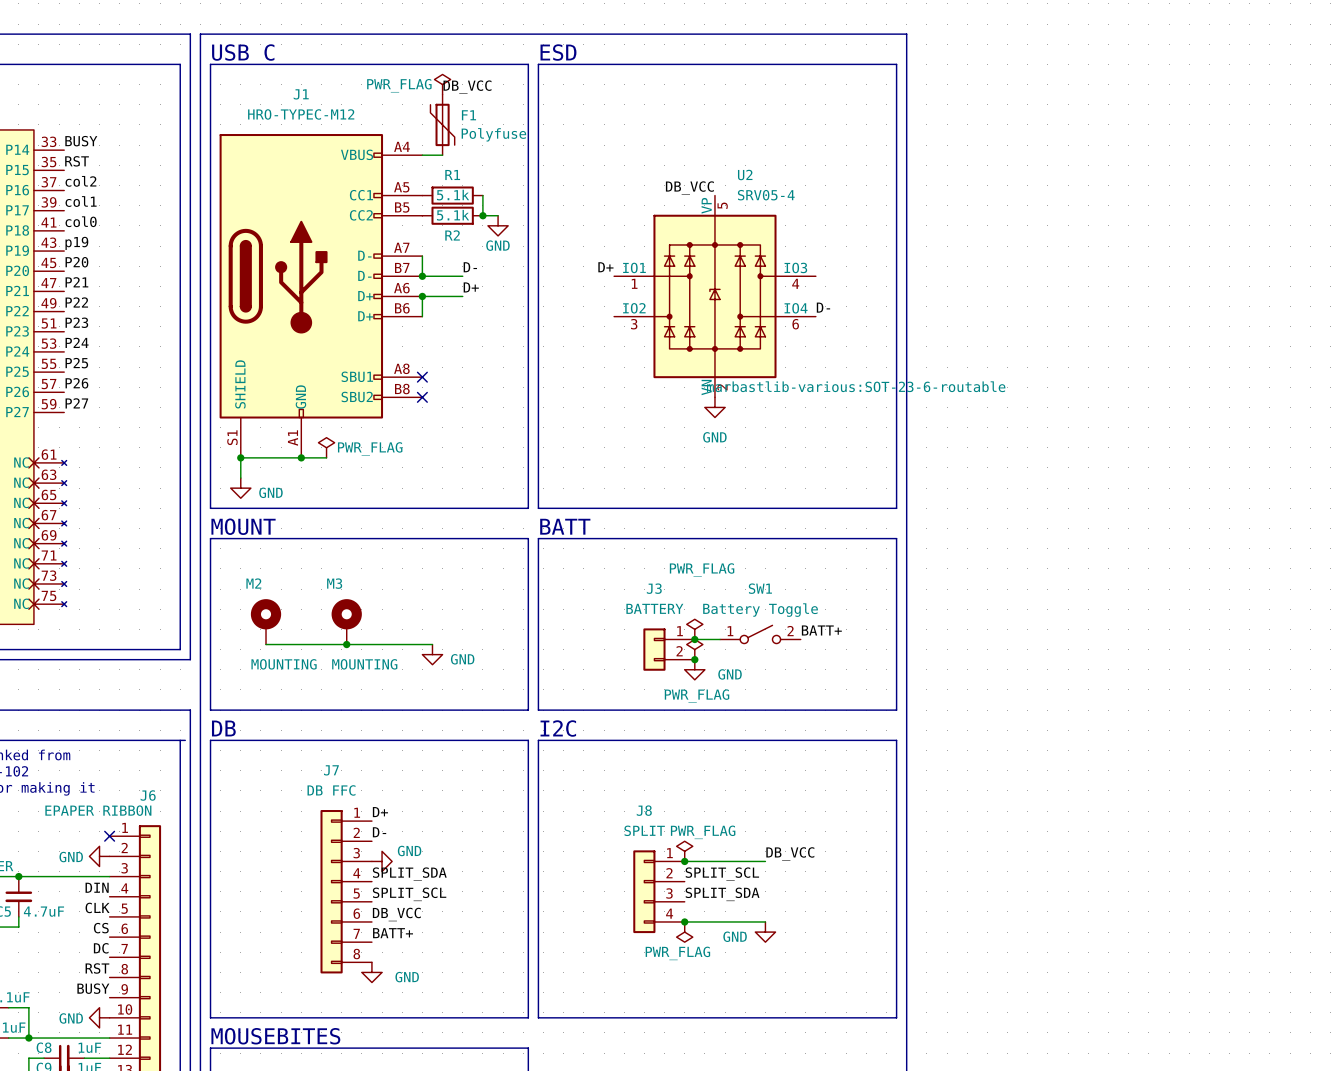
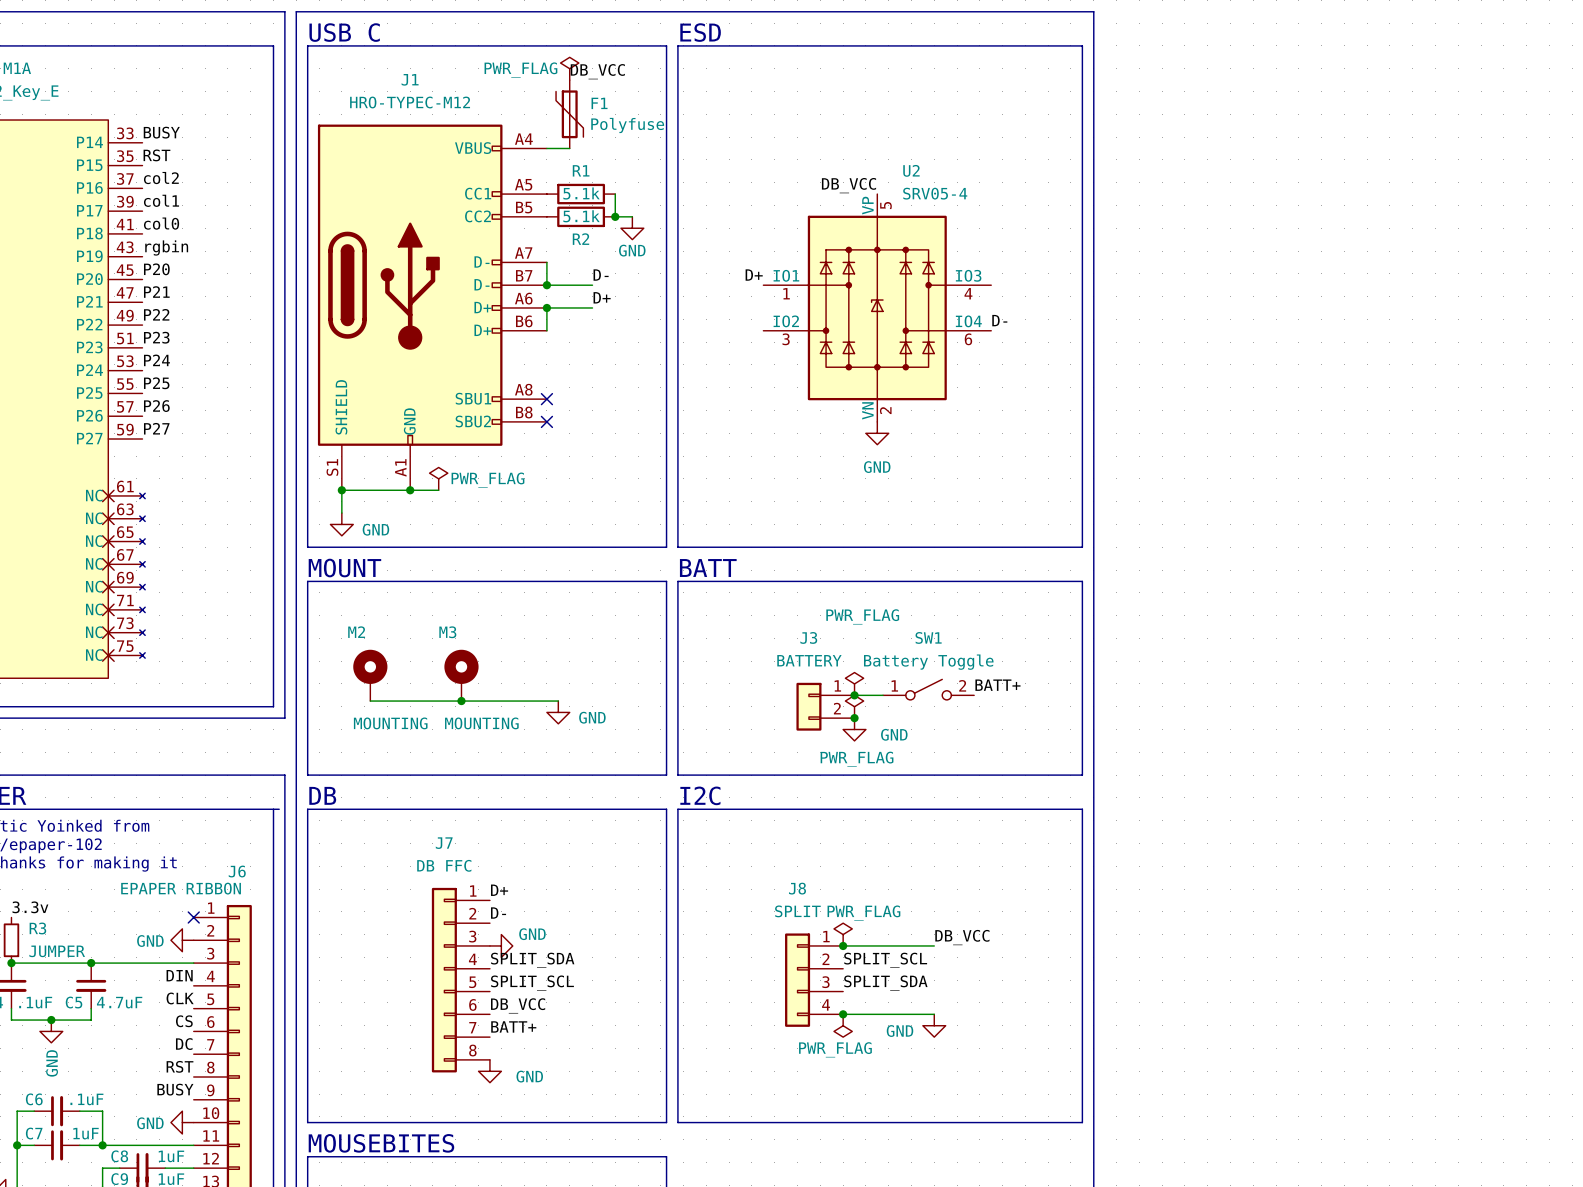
label: p19 (76, 243) -> rgbin (166, 247)
U2 text: marbastlib-various:SOT-23-6-routable (856, 386) -> none

